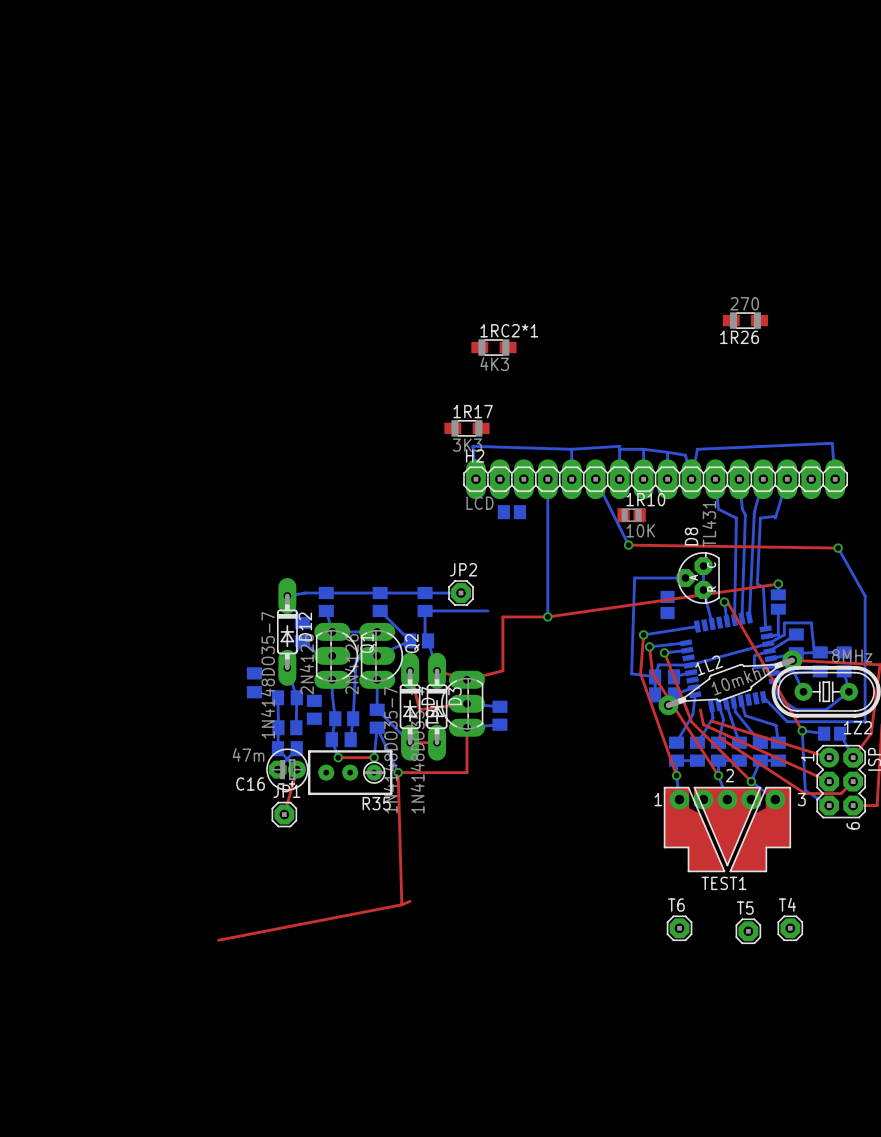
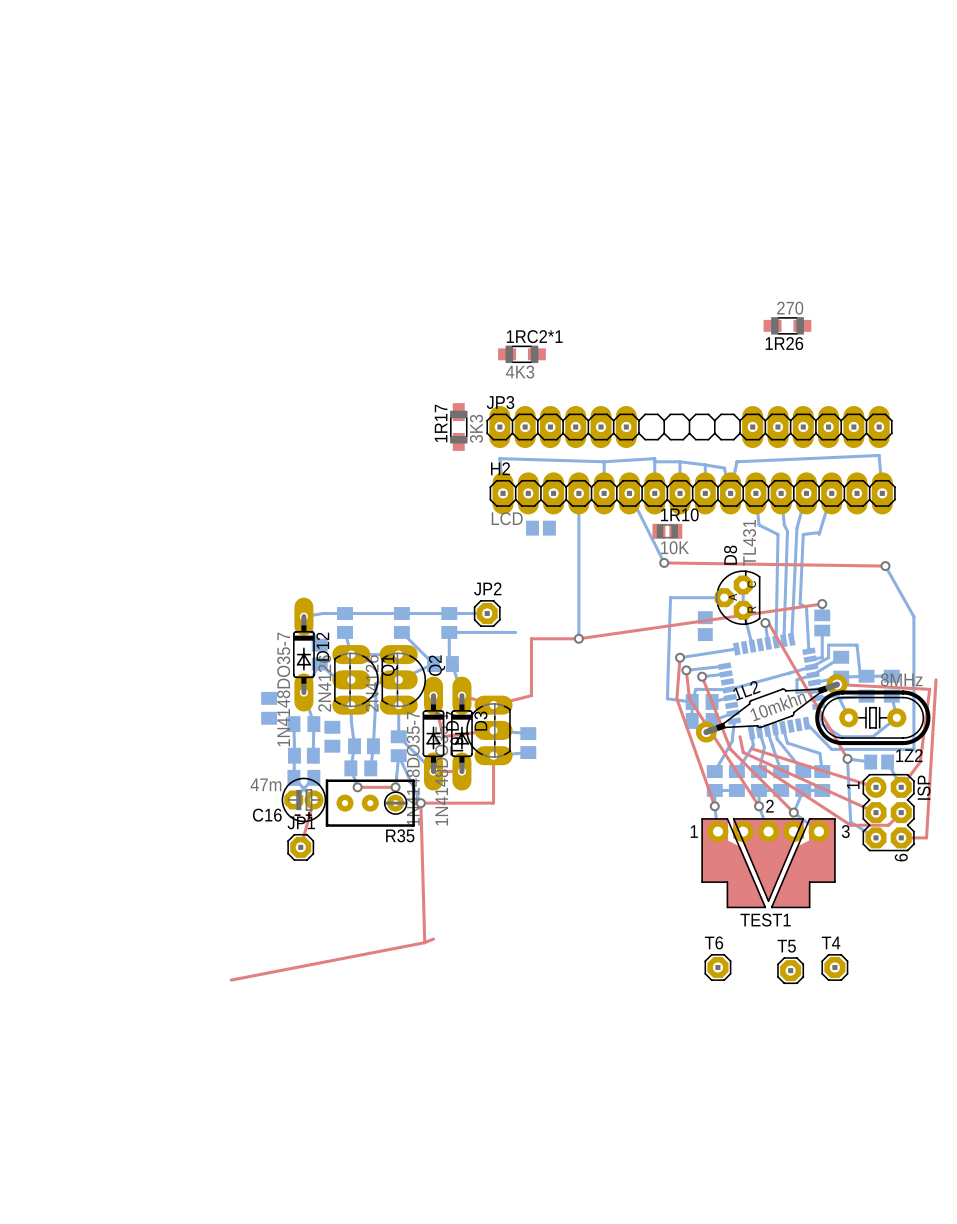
1R17 name position: 1R17 (473, 411) -> 1R17 (441, 423)
JP3: none -> (689, 427)
1R17 rotation: 0° (466, 428) -> 90° clockwise (458, 427)
1R17 position: (466, 428) -> (458, 427)
1R17 value position: 3K3 (467, 445) -> 3K3 (476, 428)

